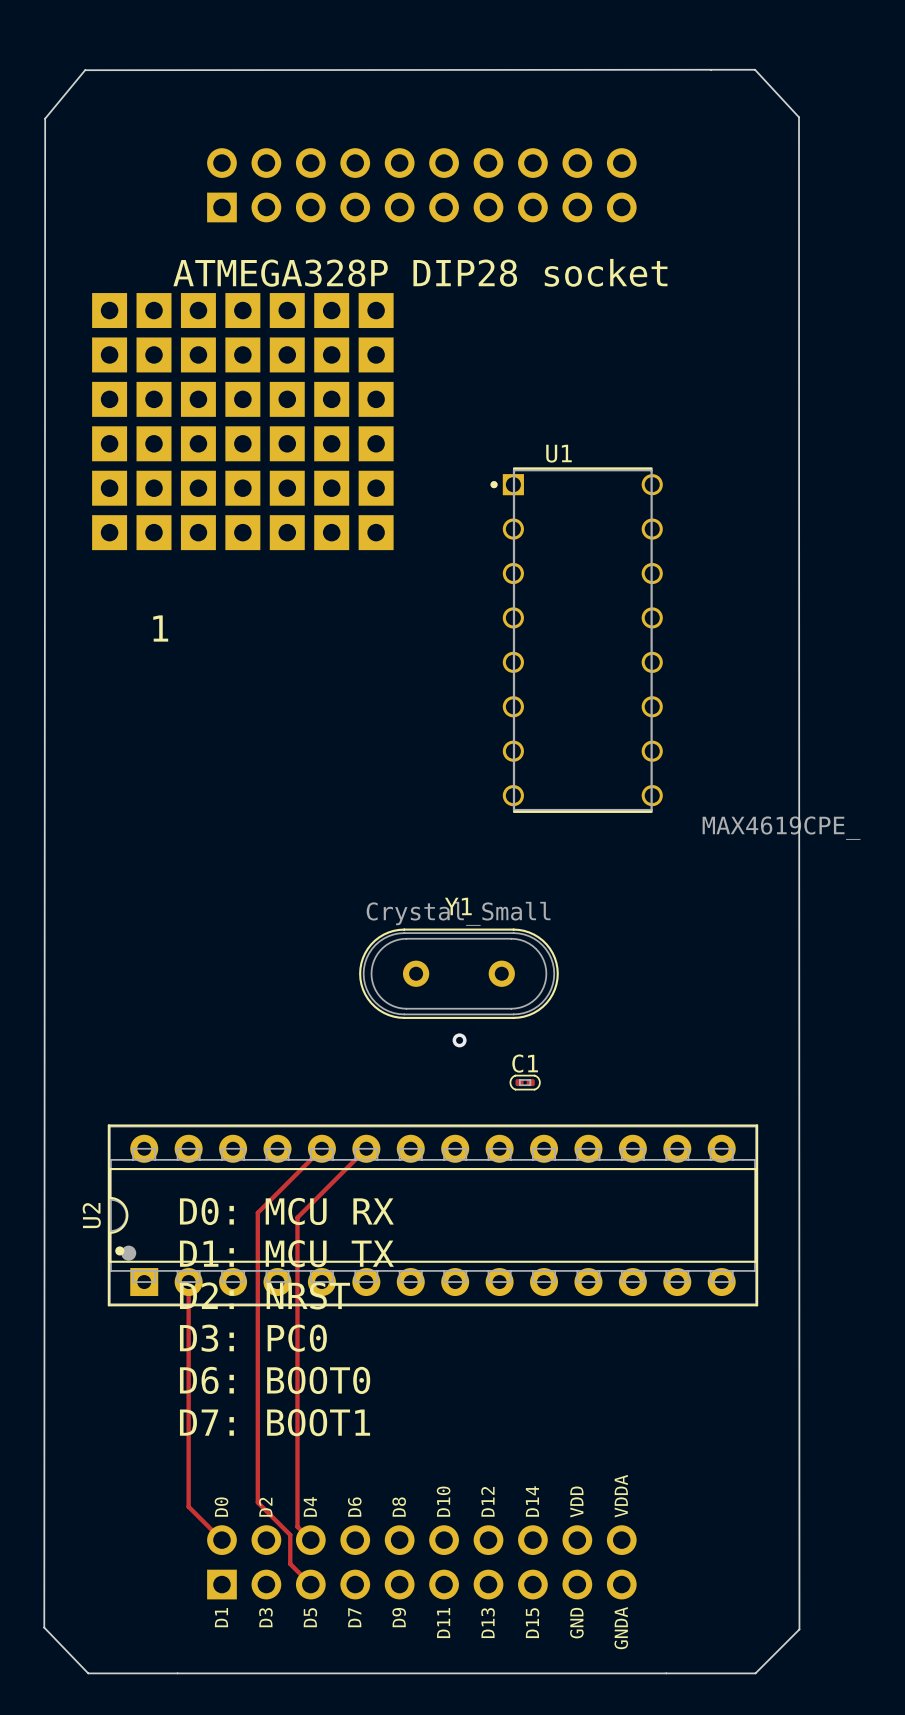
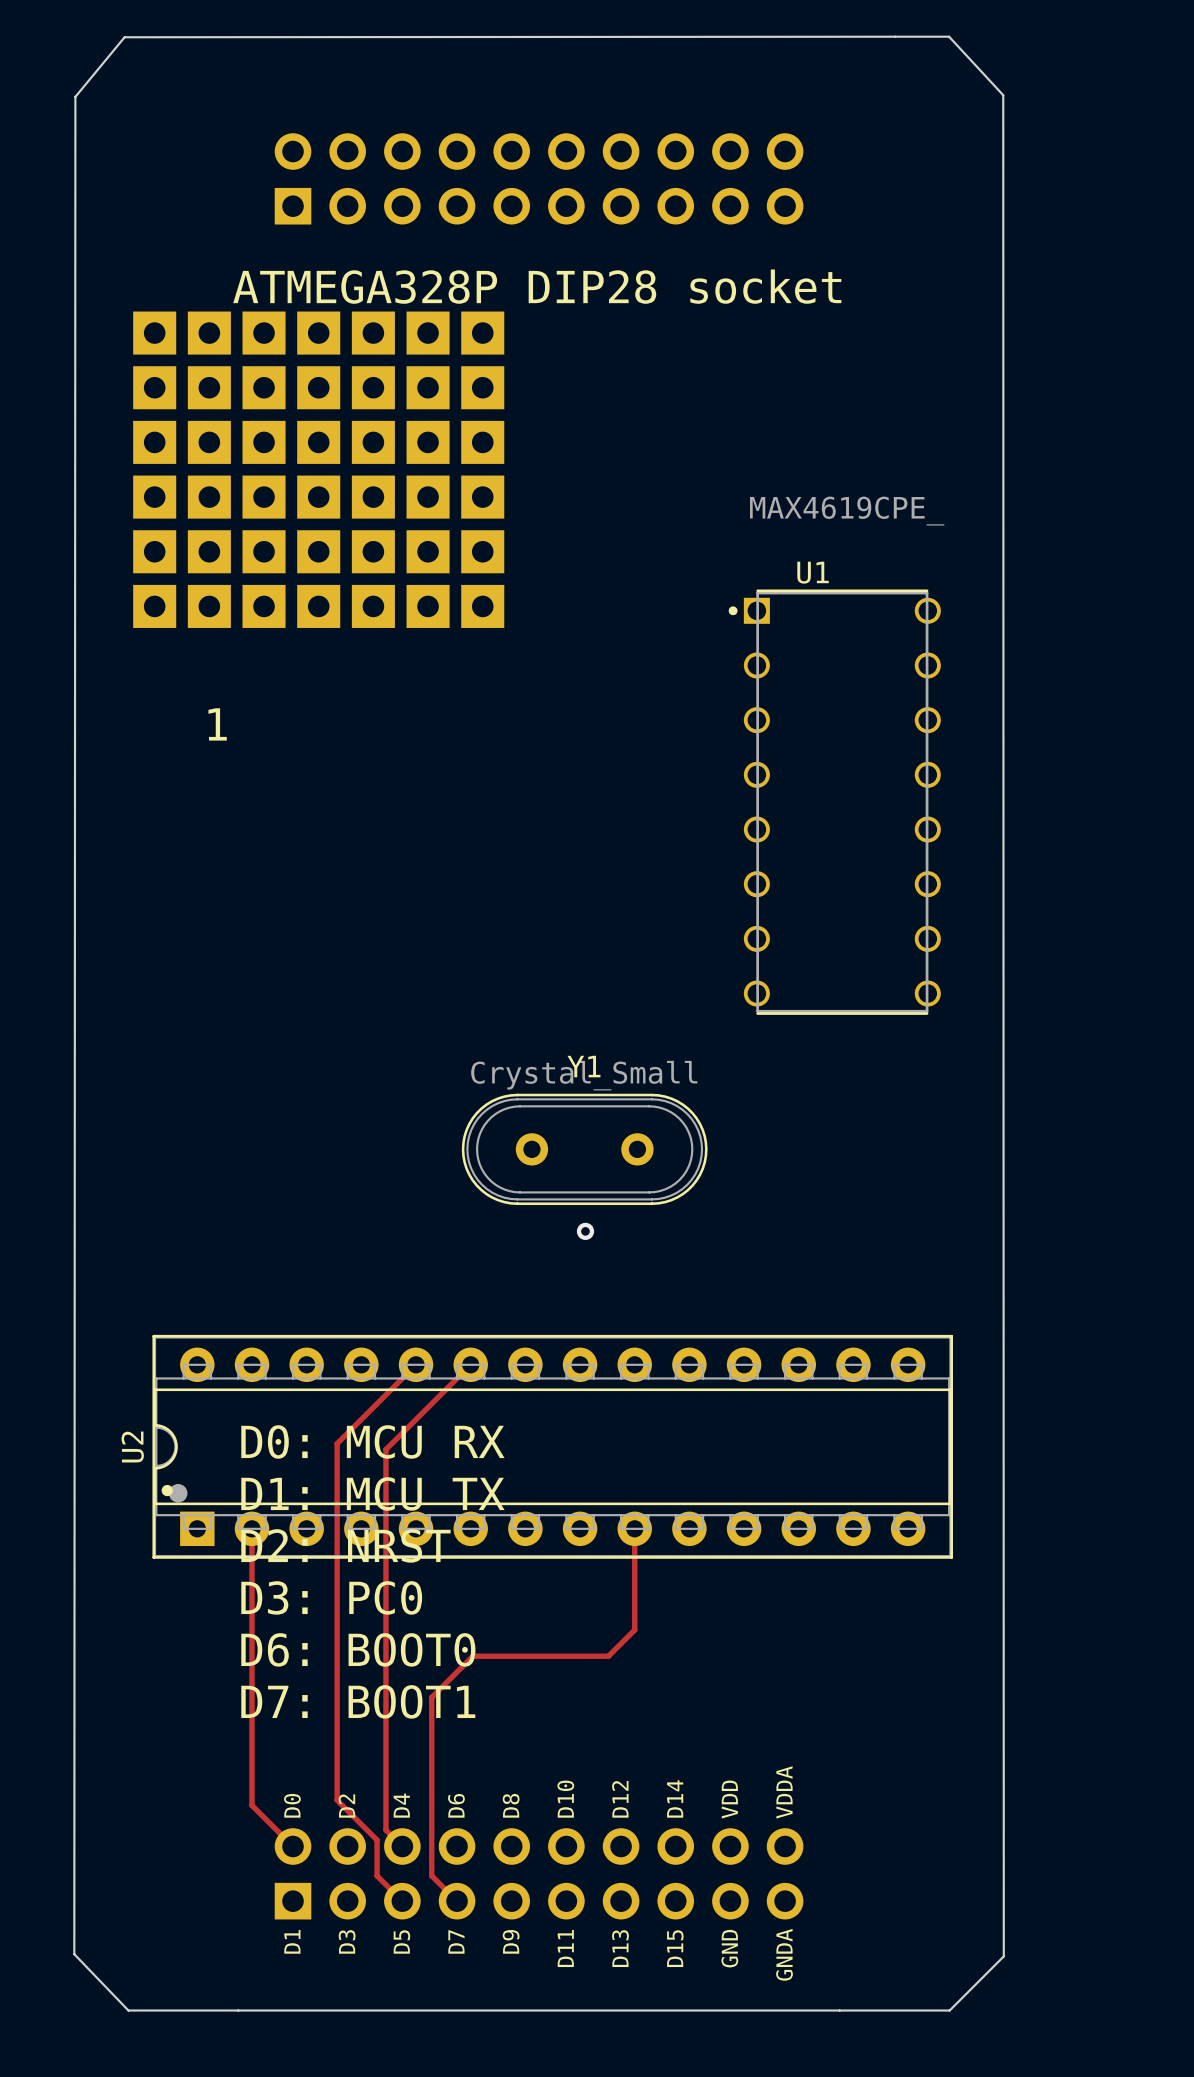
U1 position: (576, 640) -> (834, 802)
U1 value position: MAX4619CPE_ (781, 828) -> MAX4619CPE_ (847, 511)
C1: (525, 1082) -> none
track: none -> (634, 1528) (634, 1629) (608, 1656) (472, 1656) (431, 1697) (431, 1875) (457, 1901)

